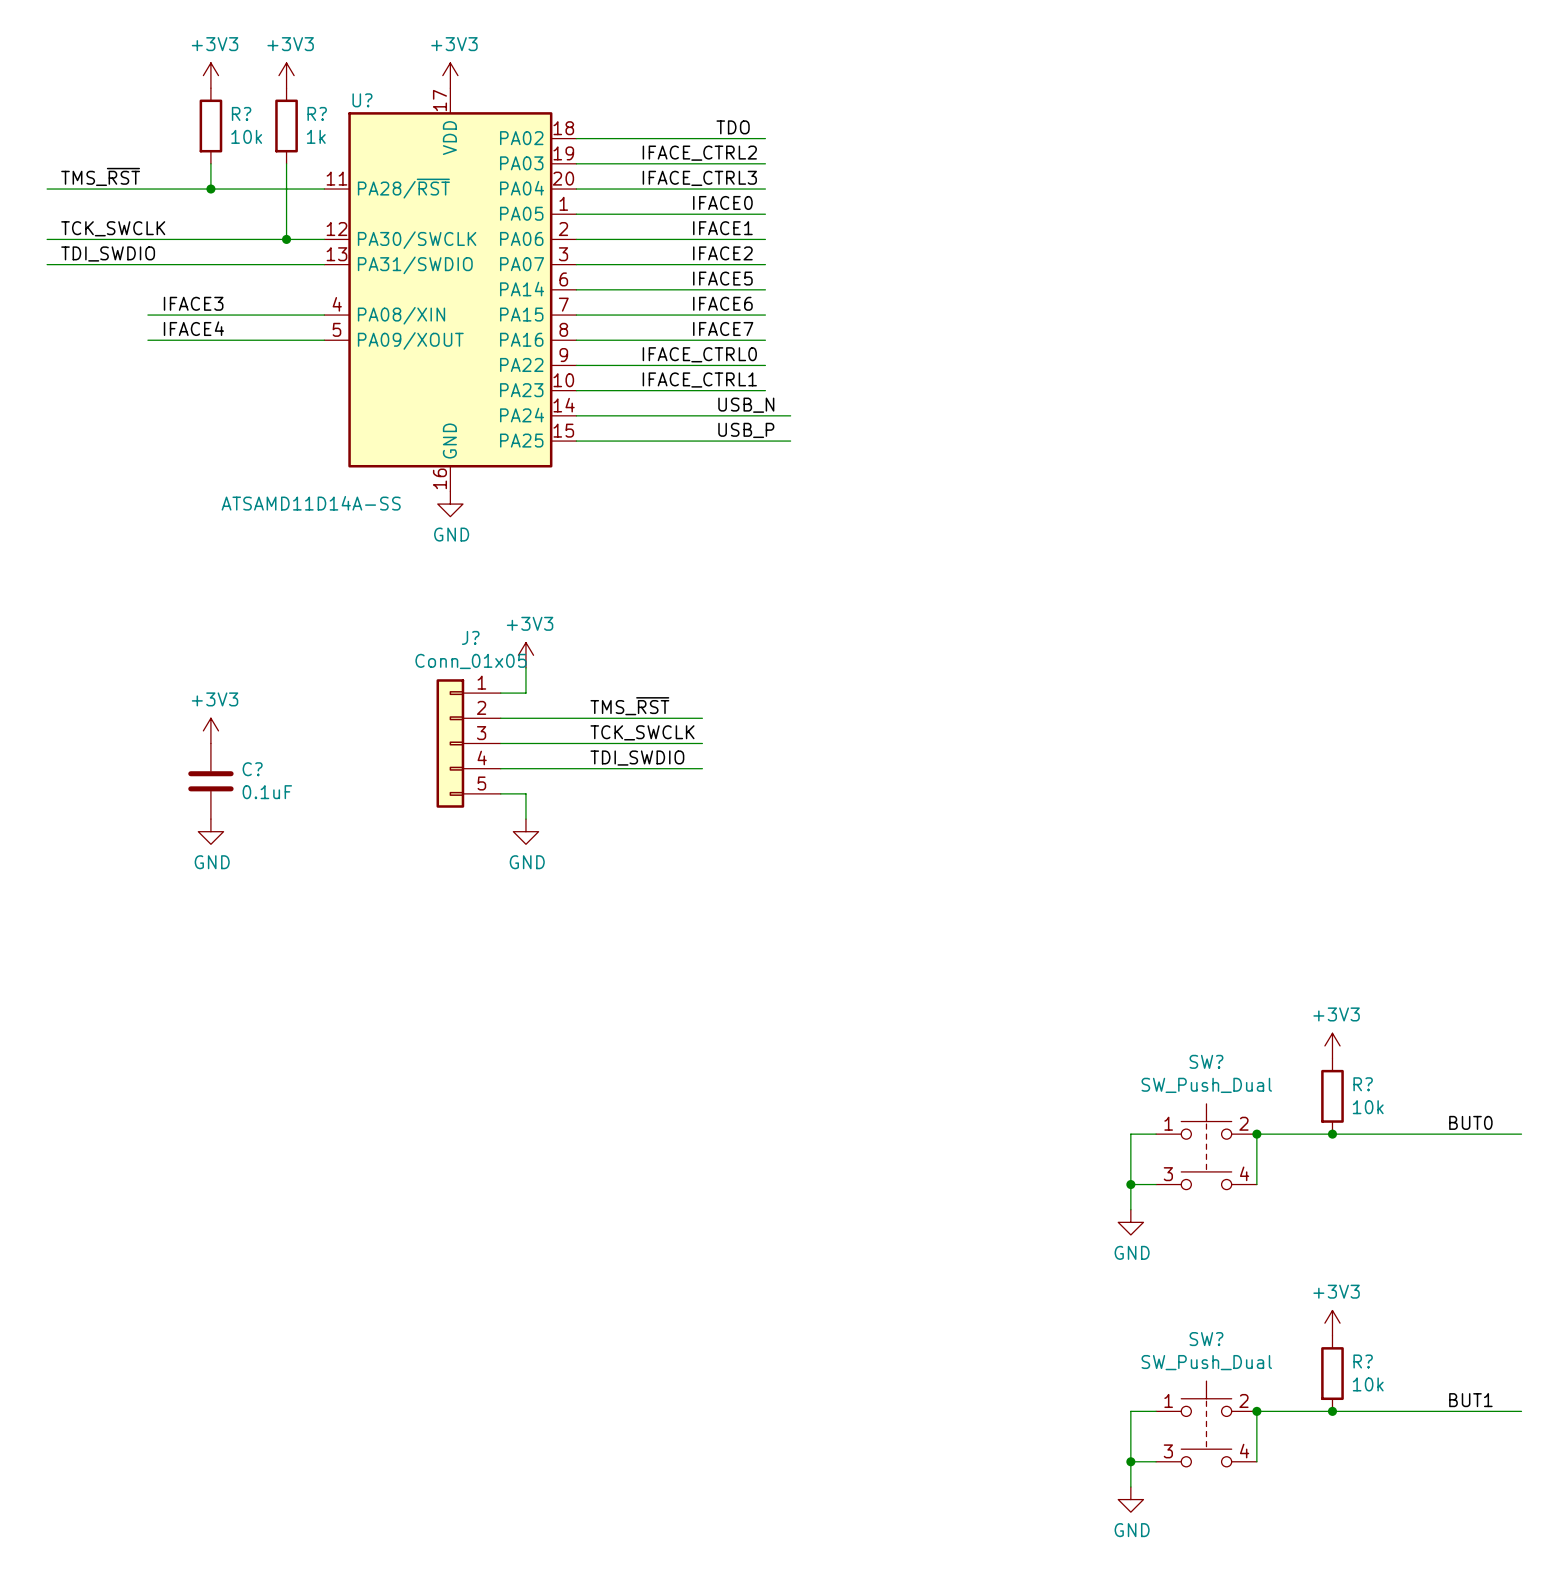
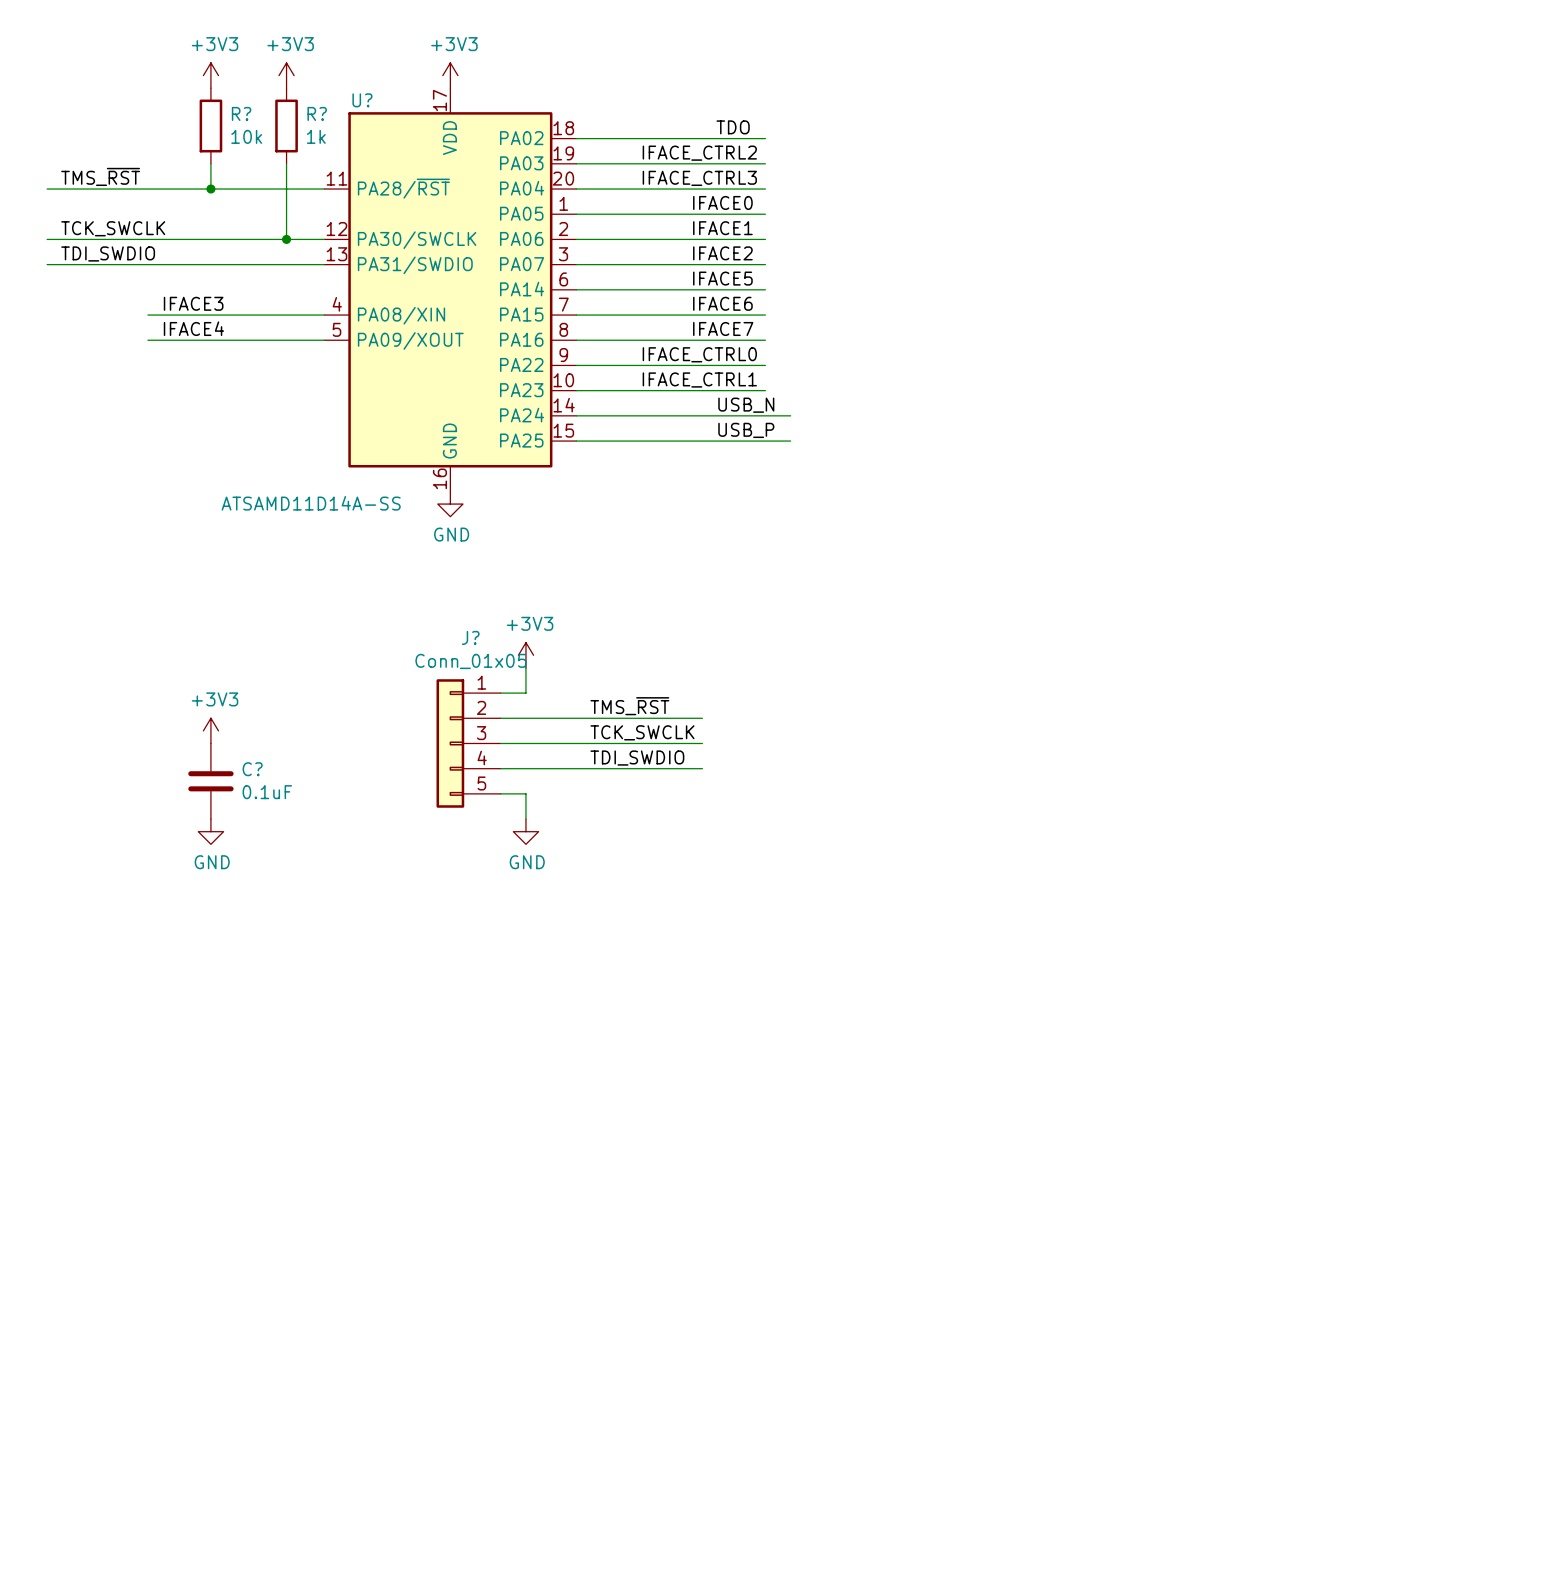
power symbol: +3V3 (1332, 1045) -> none
R?: 10k (1332, 1096) -> none
label: BUT0 (1470, 1122) -> none
wire: (1156, 1134) (1130, 1134) (1130, 1209) -> none
junction: (1256, 1134) -> none
junction: (1332, 1134) -> none
wire: (1521, 1134) (1256, 1134) (1256, 1184) -> none
SW?: SW_Push_Dual (1206, 1146) -> none
wire: (1130, 1184) (1156, 1184) -> none
junction: (1130, 1184) -> none
power symbol: GND (1130, 1222) -> none
power symbol: +3V3 (1332, 1323) -> none
R?: 10k (1332, 1373) -> none
label: BUT1 (1470, 1400) -> none
wire: (1156, 1411) (1130, 1411) (1130, 1486) -> none
junction: (1256, 1411) -> none
junction: (1332, 1411) -> none
wire: (1521, 1411) (1256, 1411) (1256, 1461) -> none
SW?: SW_Push_Dual (1206, 1423) -> none
wire: (1130, 1461) (1156, 1461) -> none
junction: (1130, 1461) -> none
power symbol: GND (1130, 1499) -> none

